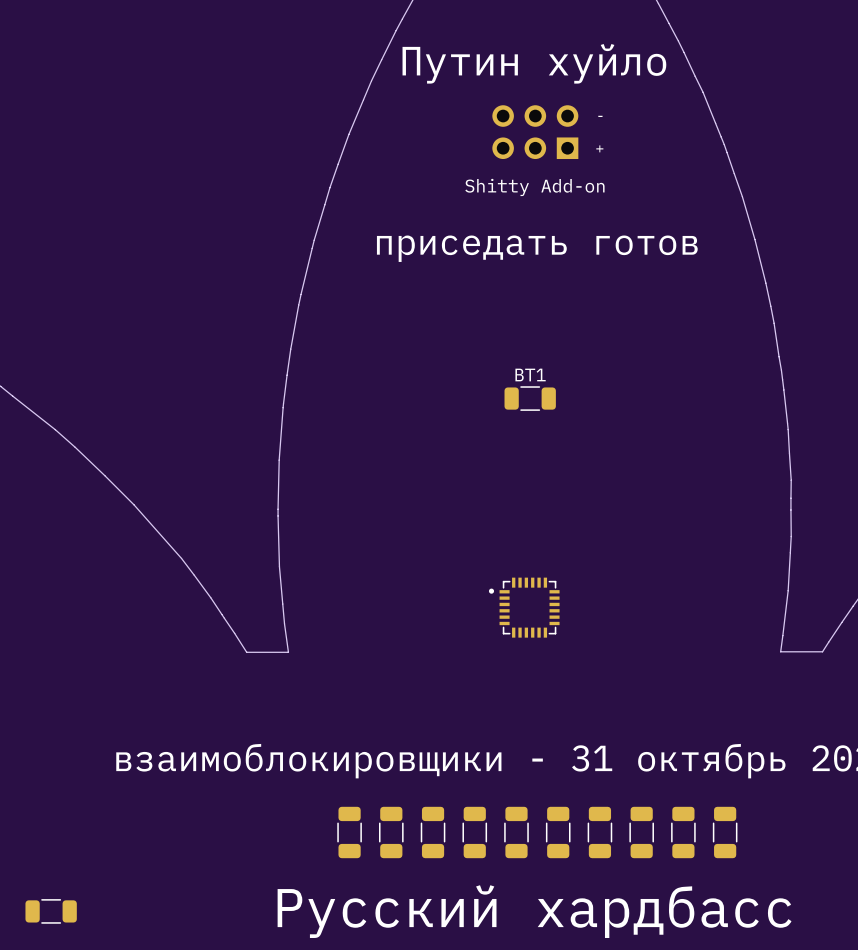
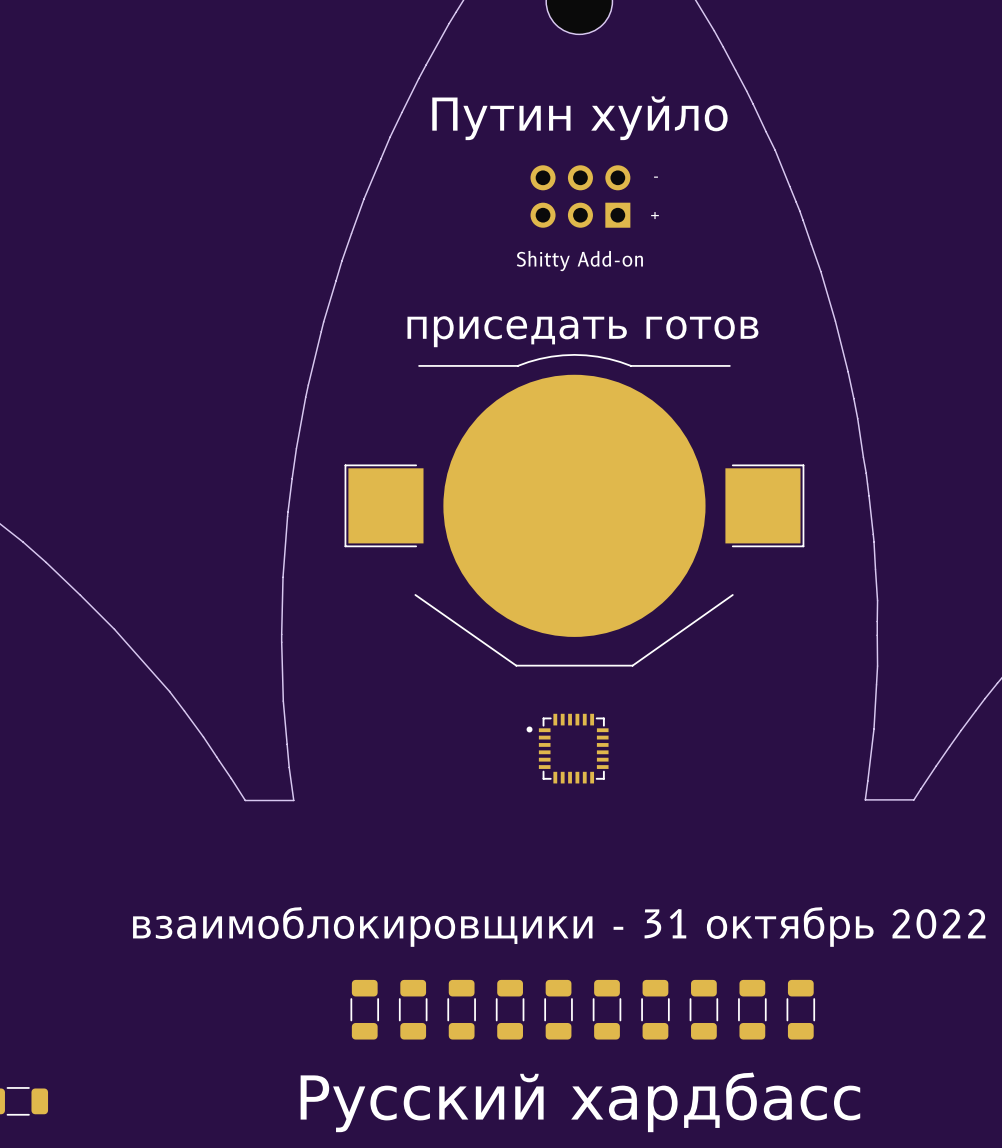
BT1: (530, 398) -> none
part: none -> (574, 510)

